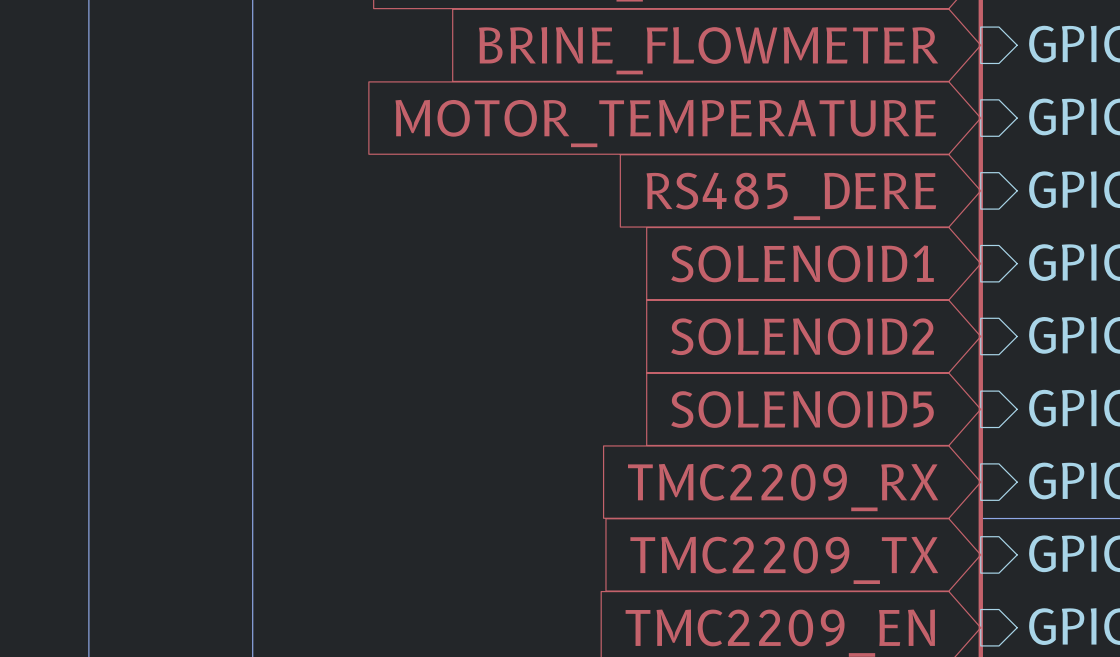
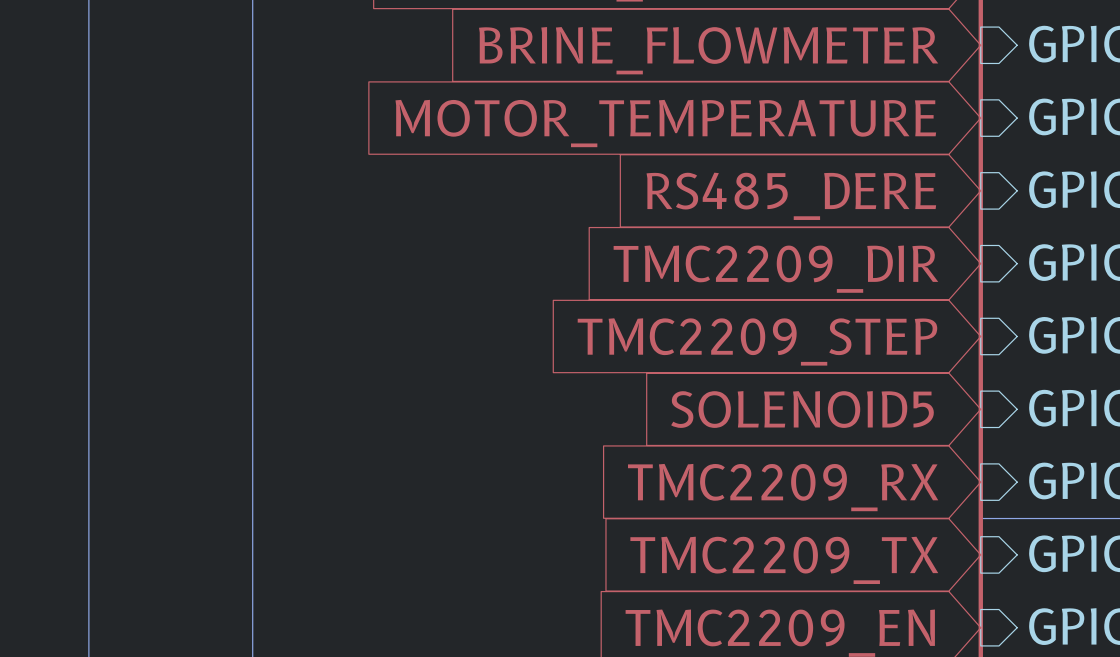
global label: SOLENOID1 (802, 263) -> TMC2209_DIR (775, 269)
global label: SOLENOID2 (802, 336) -> TMC2209_STEP (757, 341)

